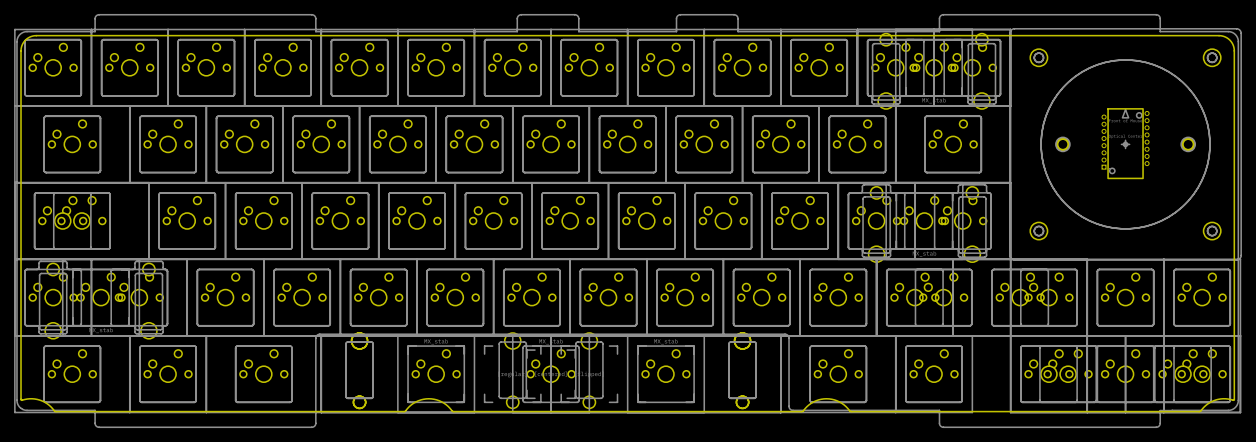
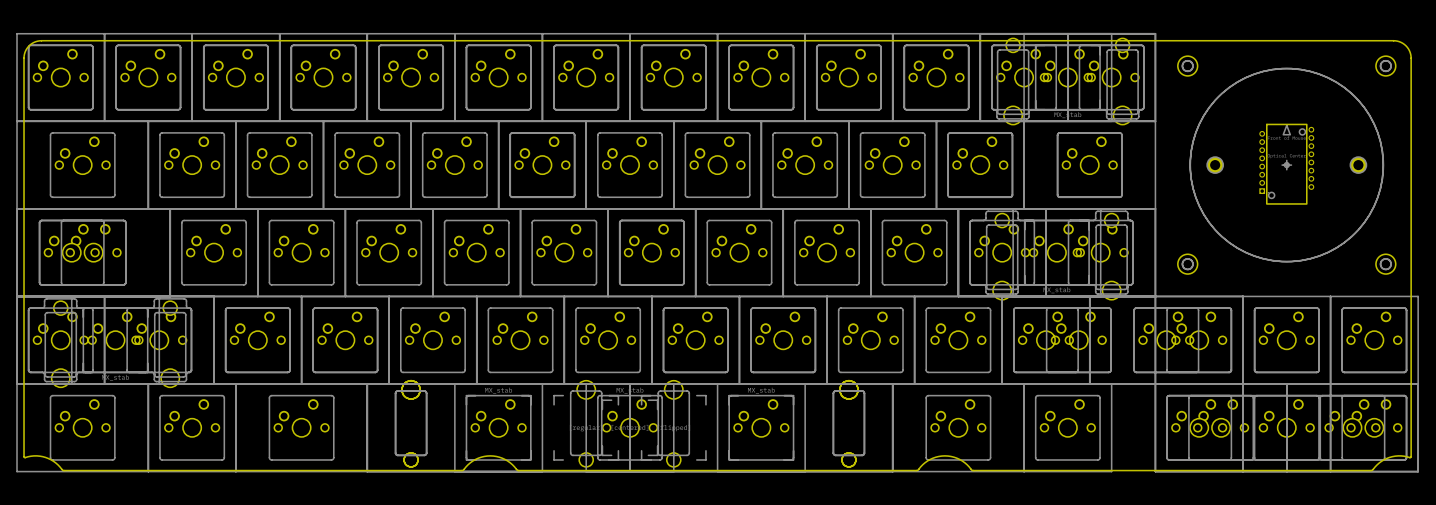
line: (99, 14) (312, 14) (315, 17) (315, 31) (517, 31) (517, 17) (521, 14) (576, 14) (578, 18) (578, 31) (676, 31) (676, 17) (680, 14) (735, 14) (738, 18) (738, 31) (939, 31) (939, 17) (943, 14) (1156, 14) (1160, 17) (1160, 31) (1231, 32) (1236, 36) (1238, 41) (1237, 403) (1234, 408) (1229, 410) (1160, 410) (1160, 424) (1156, 427) (943, 427) (939, 424) (939, 410) (790, 409) (789, 406) (788, 337) (785, 334) (319, 334) (315, 337) (315, 423) (312, 427) (98, 427) (95, 424) (95, 410) (23, 409) (18, 405) (16, 400) (17, 39) (20, 33) (25, 31) (95, 31) (95, 17) (99, 14) -> none
line: (1014, 28) (1239, 30) (1239, 258) (1011, 258) (1009, 33) (1014, 28) -> none
line: (46, 116) (99, 116) (99, 171) (44, 171) (44, 118) (46, 116) -> none
line: (141, 116) (195, 116) (195, 171) (140, 171) (139, 118) (141, 116) -> none
line: (218, 116) (272, 116) (272, 171) (217, 171) (216, 118) (218, 116) -> none
line: (295, 116) (348, 116) (348, 171) (293, 171) (293, 118) (295, 116) -> none
line: (371, 116) (425, 116) (425, 171) (370, 171) (369, 118) (371, 116) -> none
line: (524, 116) (578, 116) (578, 171) (523, 171) (522, 118) (524, 116) -> none
line: (601, 116) (655, 116) (655, 171) (600, 171) (599, 118) (601, 116) -> none
line: (678, 116) (731, 116) (731, 171) (676, 171) (676, 118) (678, 116) -> none
line: (754, 116) (808, 116) (808, 171) (753, 171) (752, 118) (754, 116) -> none
line: (161, 192) (214, 193) (214, 248) (159, 248) (159, 194) (161, 192) -> none
line: (237, 192) (291, 193) (291, 248) (236, 248) (235, 194) (237, 192) -> none
line: (314, 192) (367, 193) (367, 248) (312, 248) (312, 194) (314, 192) -> none
line: (390, 192) (444, 193) (444, 248) (389, 248) (388, 194) (390, 192) -> none
line: (467, 192) (521, 193) (521, 248) (466, 248) (465, 194) (467, 192) -> none
line: (620, 192) (674, 193) (674, 248) (619, 248) (618, 194) (620, 192) -> none
line: (697, 192) (750, 193) (750, 248) (695, 248) (695, 194) (697, 192) -> none
line: (773, 192) (827, 193) (827, 248) (772, 248) (771, 194) (773, 192) -> none
line: (352, 269) (406, 270) (406, 325) (351, 325) (350, 271) (352, 269) -> none
line: (429, 269) (482, 270) (482, 325) (427, 325) (427, 271) (429, 269) -> none
line: (505, 269) (559, 270) (559, 325) (504, 325) (503, 271) (505, 269) -> none
line: (735, 269) (789, 270) (789, 325) (734, 325) (733, 271) (735, 269) -> none
line: (812, 269) (865, 270) (865, 325) (810, 325) (810, 271) (812, 269) -> none
line: (46, 346) (99, 346) (99, 401) (44, 401) (44, 348) (46, 346) -> none
line: (141, 346) (195, 346) (195, 401) (140, 401) (139, 348) (141, 346) -> none
line: (237, 346) (291, 346) (291, 401) (236, 401) (235, 348) (237, 346) -> none
line: (812, 346) (865, 346) (865, 401) (810, 401) (810, 348) (812, 346) -> none
line: (907, 346) (961, 346) (961, 401) (906, 401) (905, 348) (907, 346) -> none

